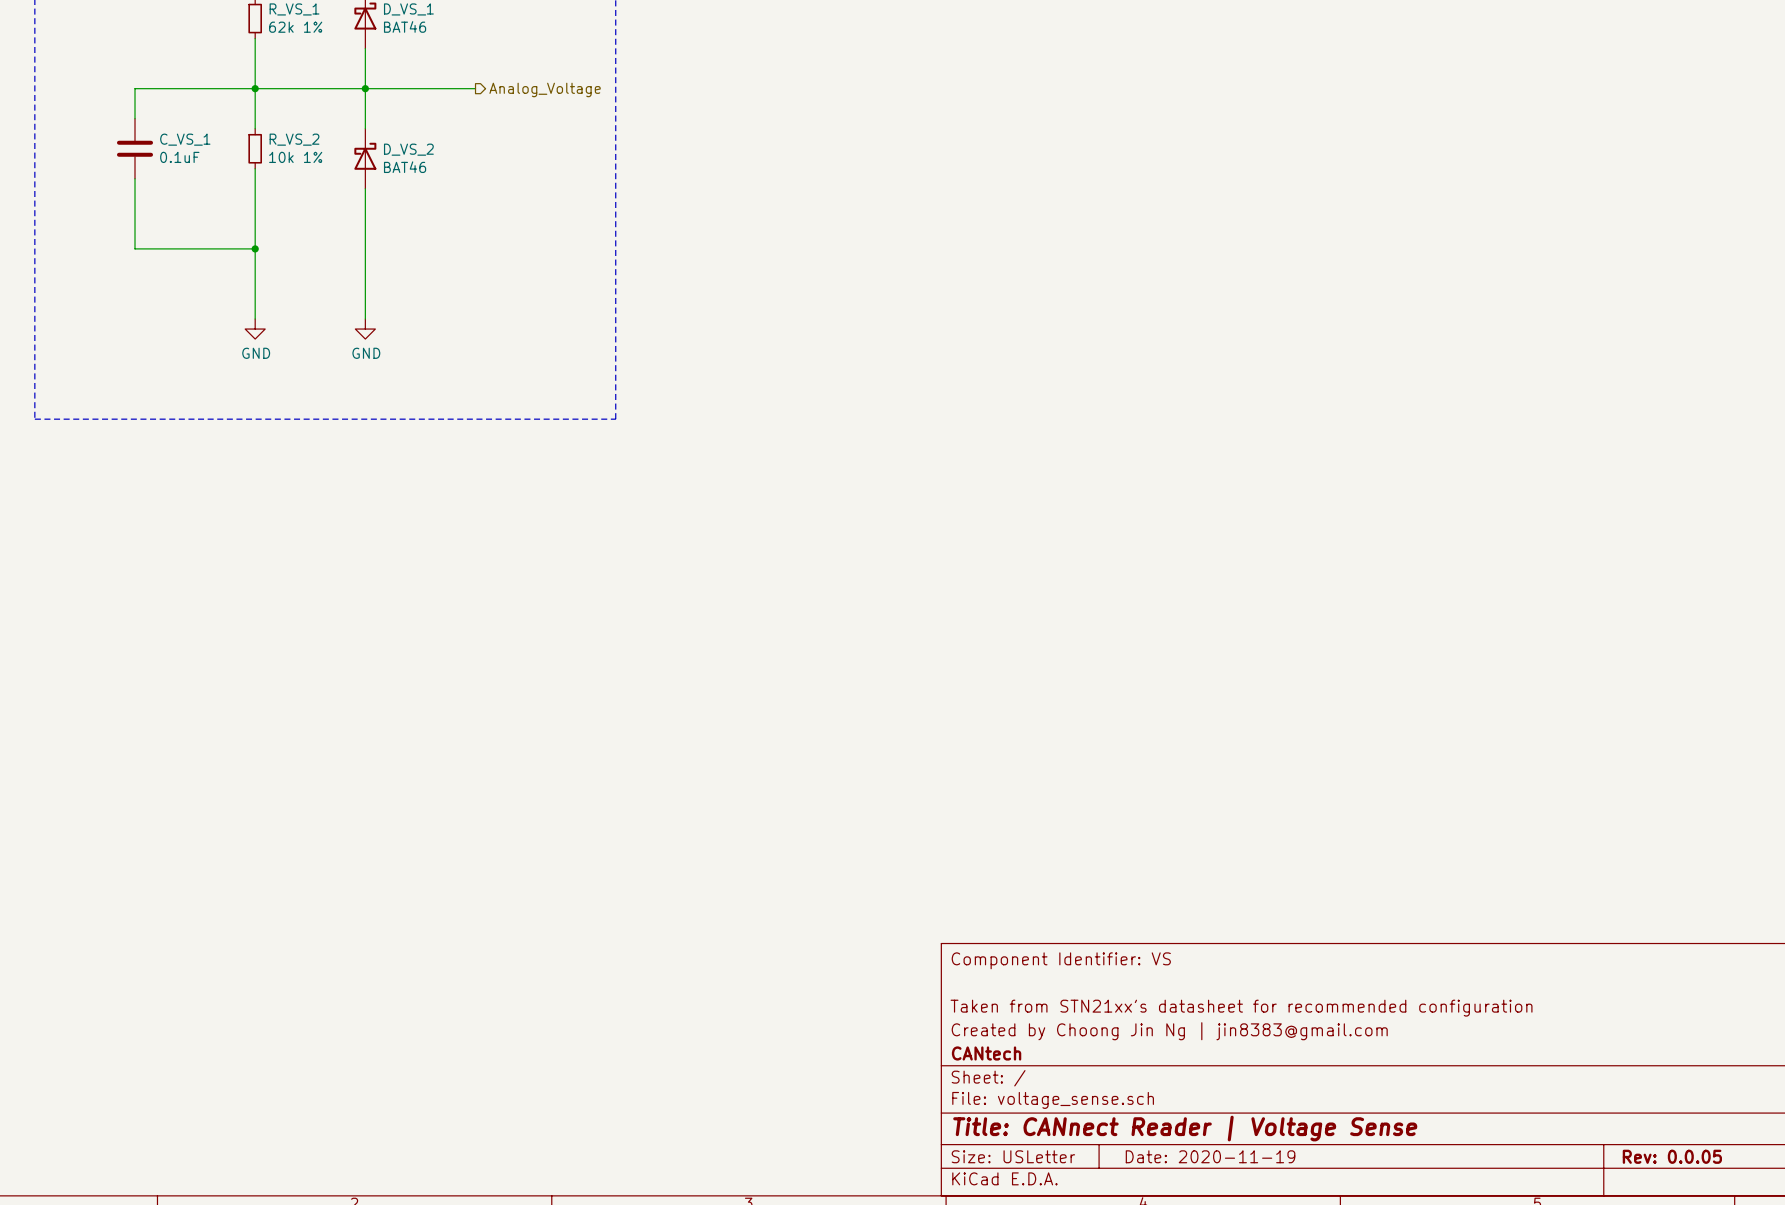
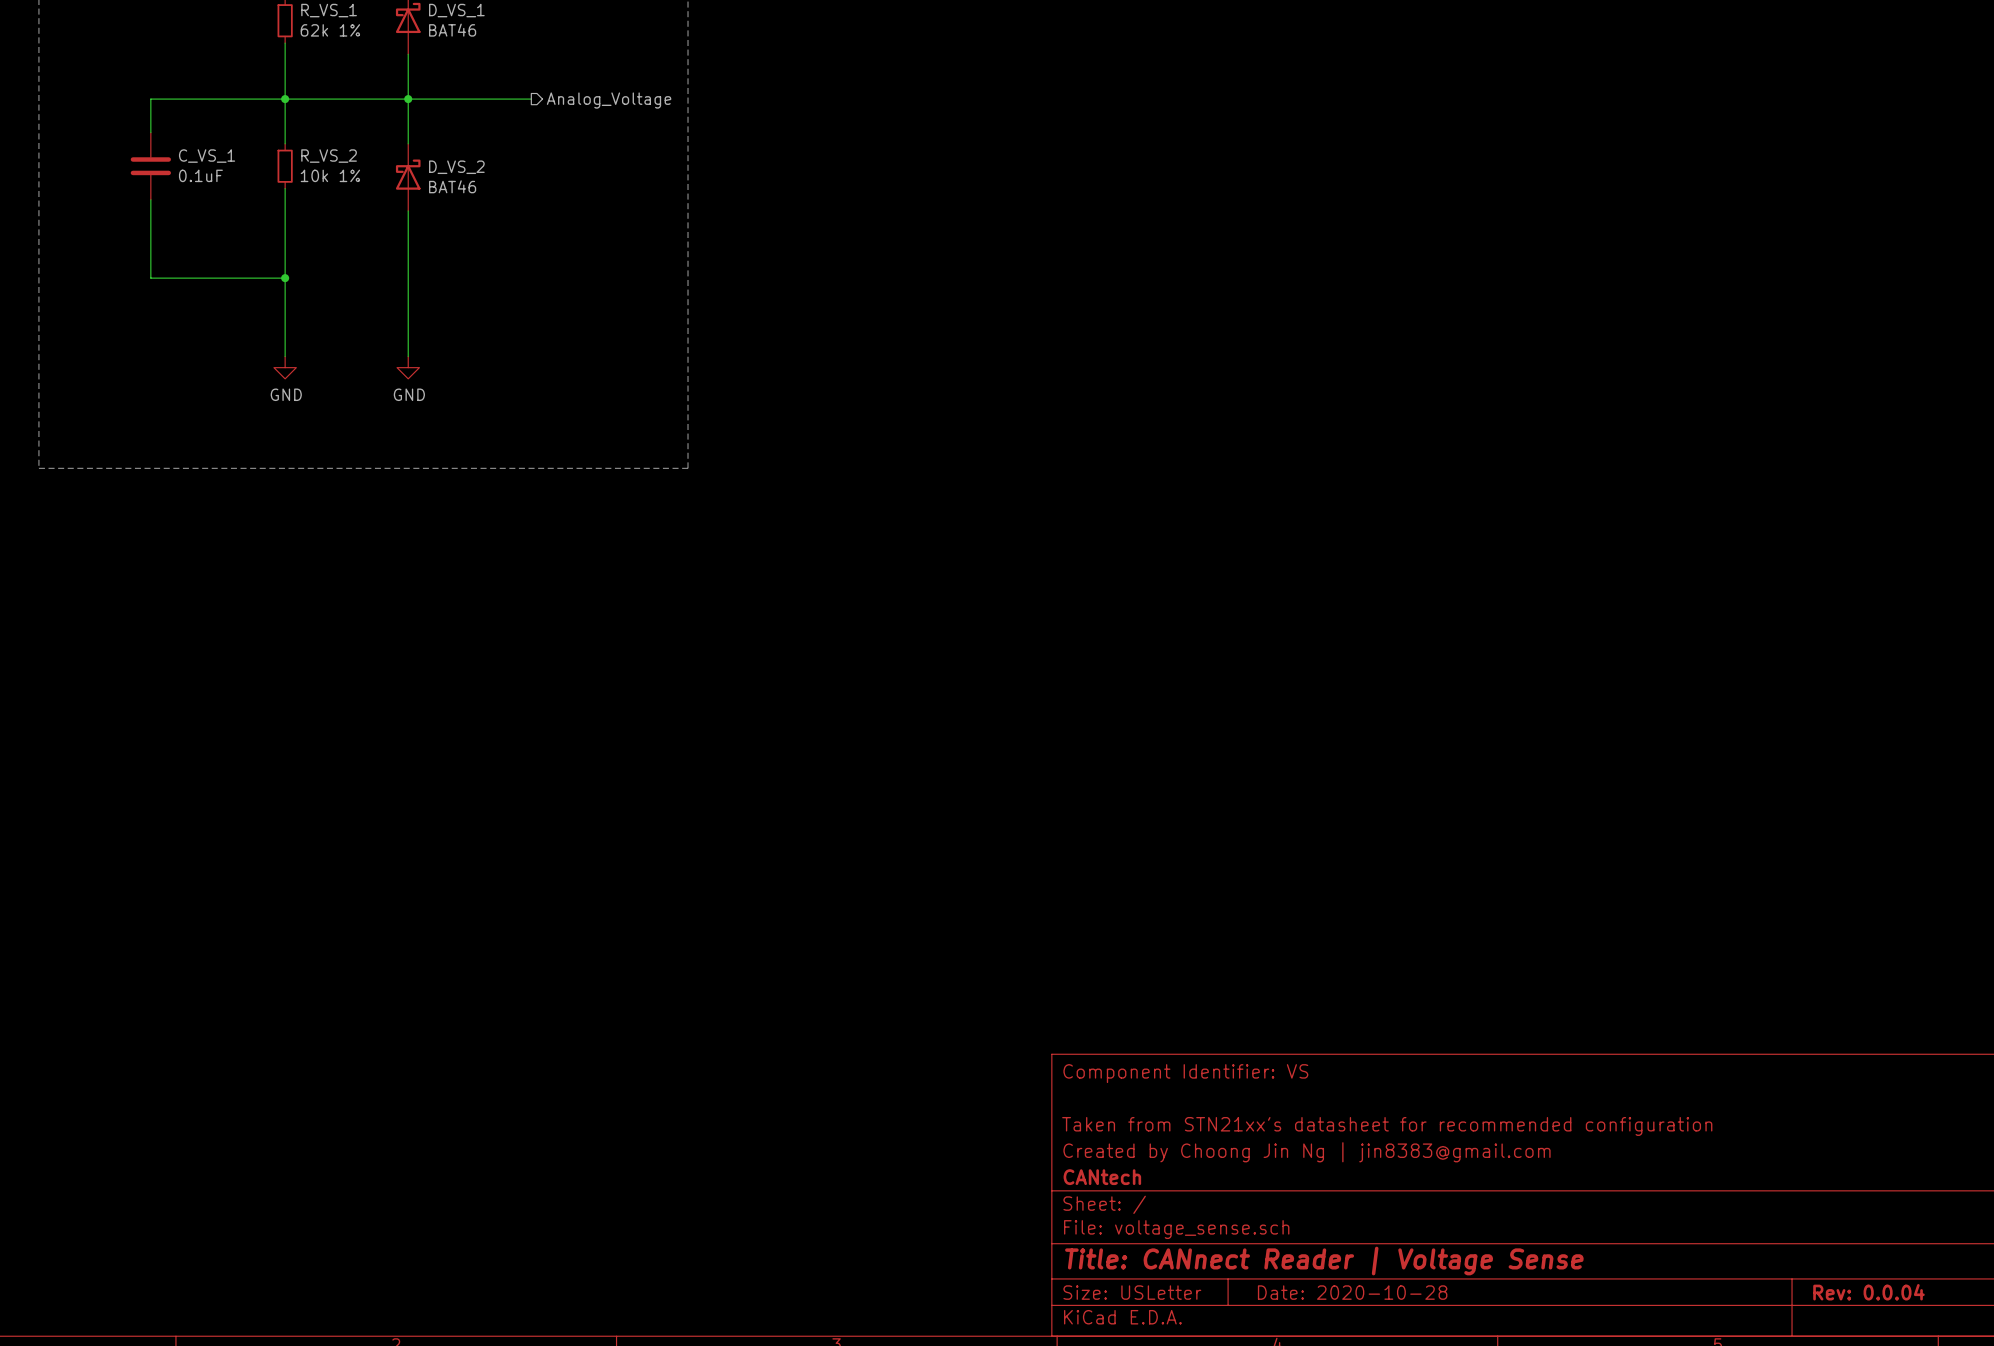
title block: Date: 2020-11-19 (1210, 1156) -> Date: 2020-10-28 (1352, 1292)
title block: Rev: 0.0.05 (1672, 1156) -> Rev: 0.0.04 (1868, 1292)

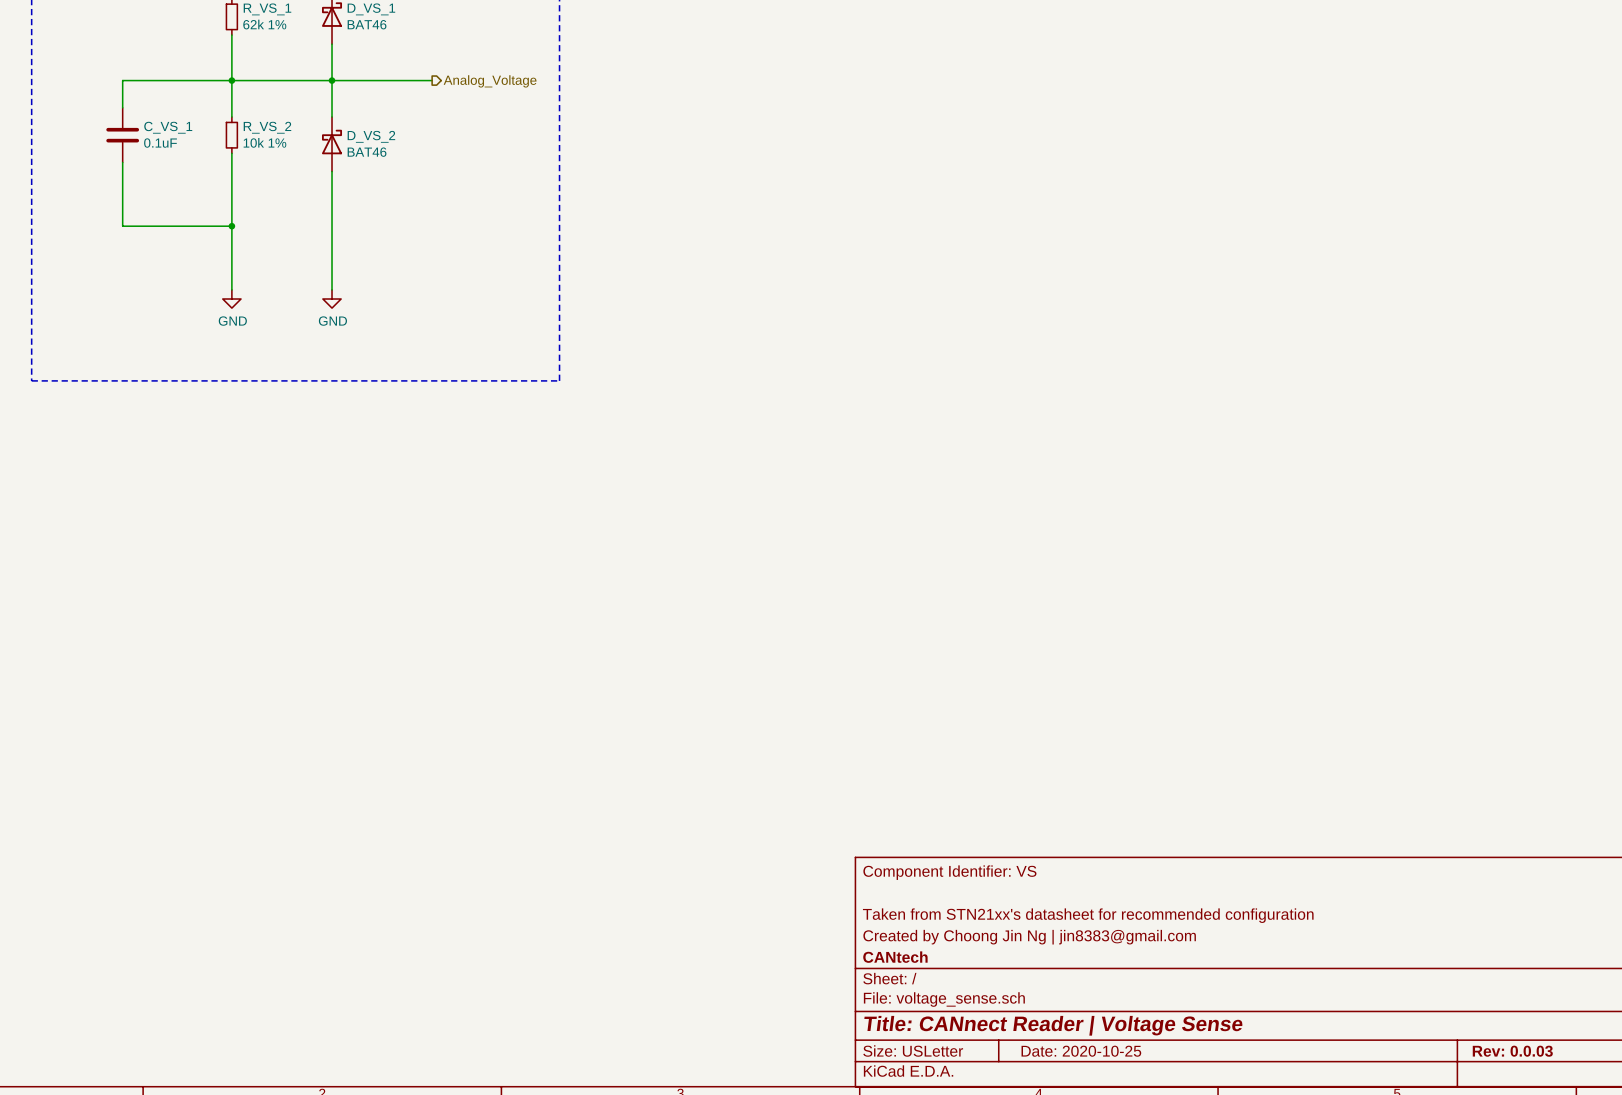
title block: Date: 2020-10-28 (1352, 1292) -> Date: 2020-10-25 (1081, 1051)
title block: Rev: 0.0.04 (1868, 1292) -> Rev: 0.0.03 (1512, 1051)

